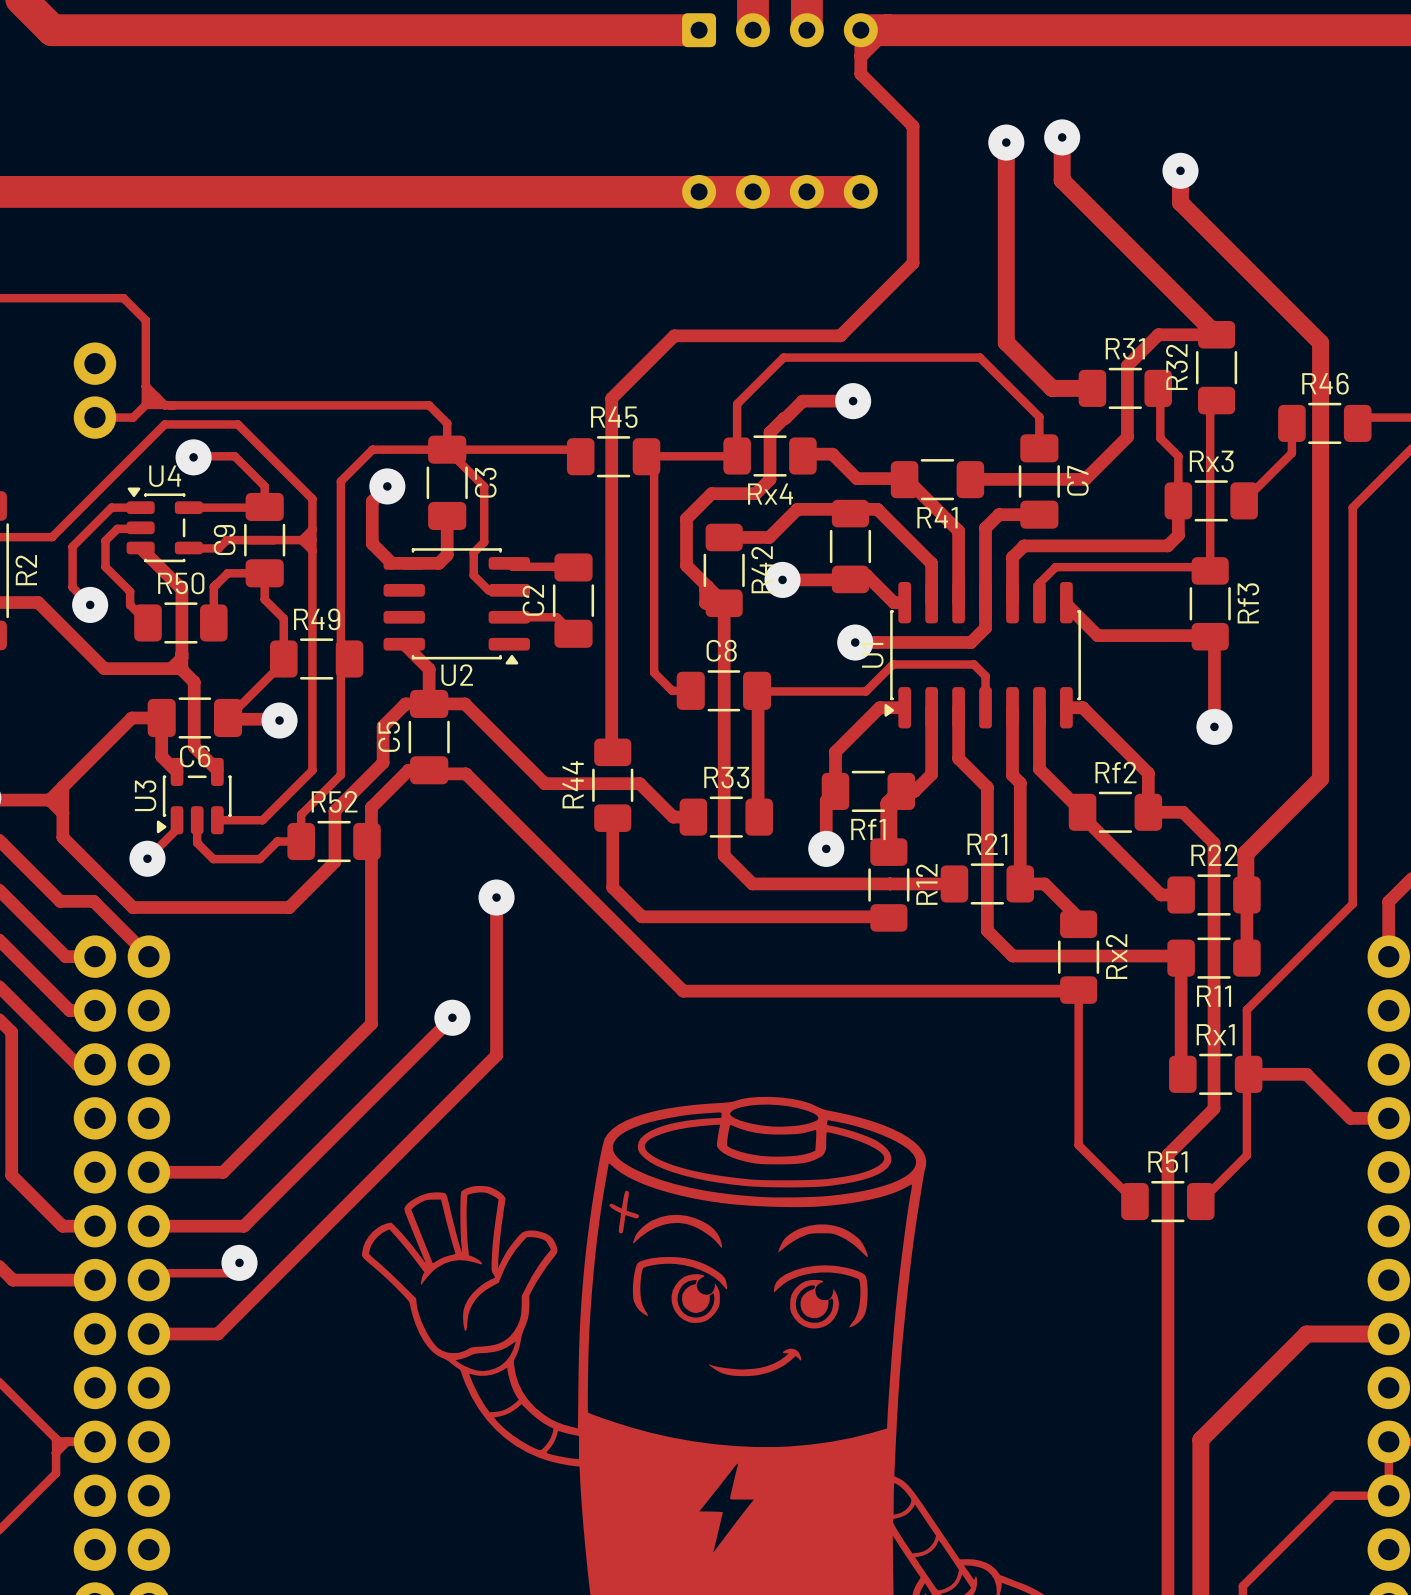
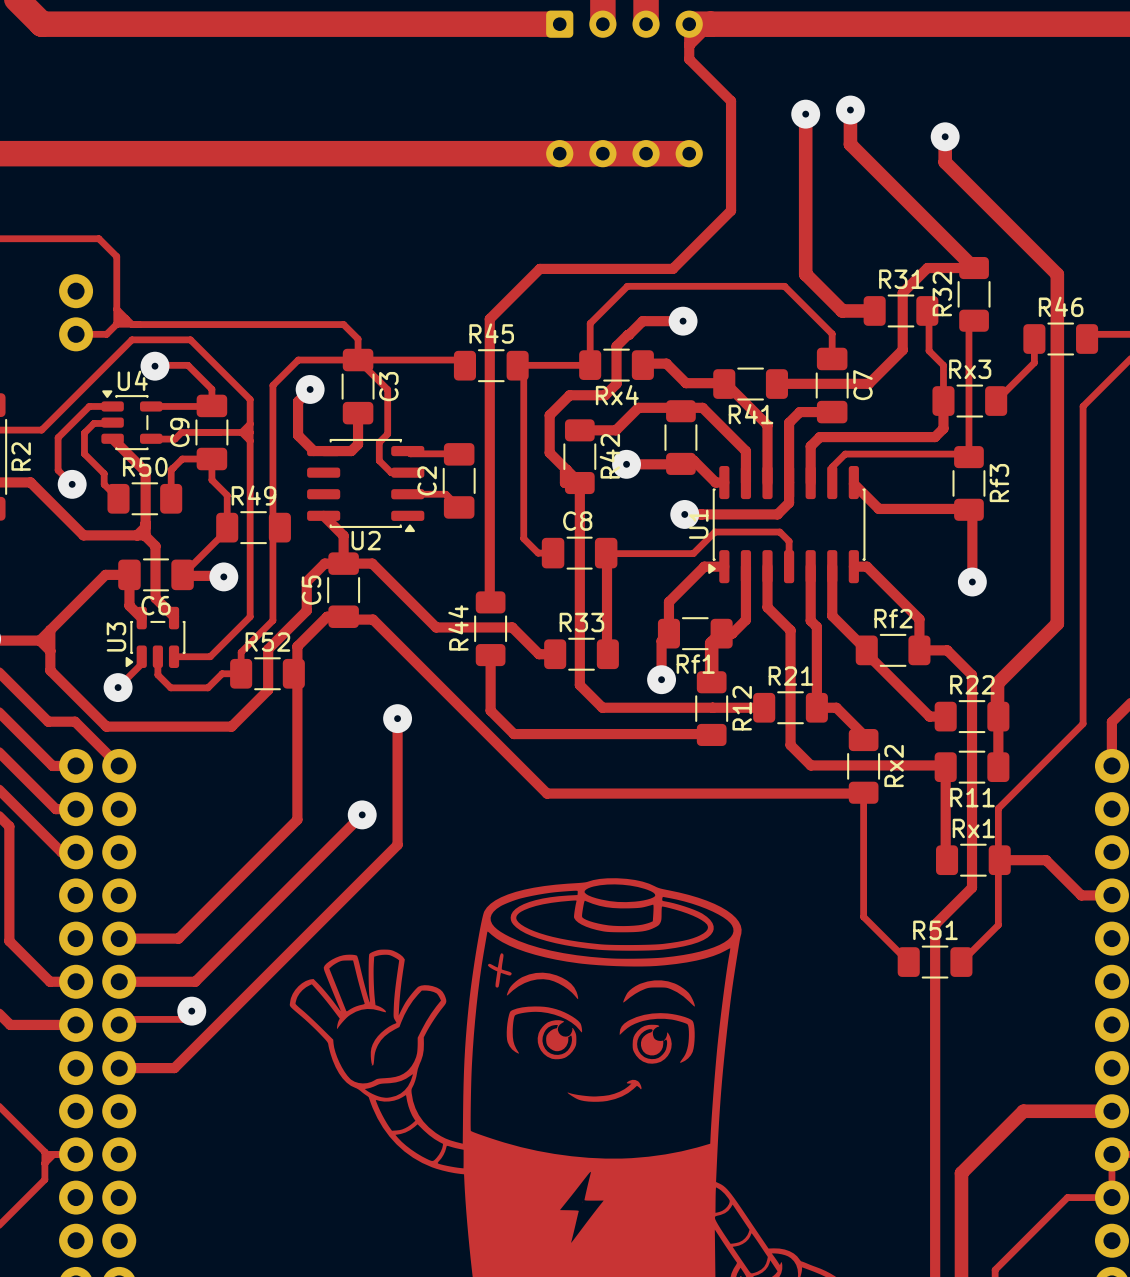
track: (1388, 1334) (1306, 1334) (1200, 1439) (1200, 1465) -> (1111, 1111) (1023, 1111) (961, 1173)

